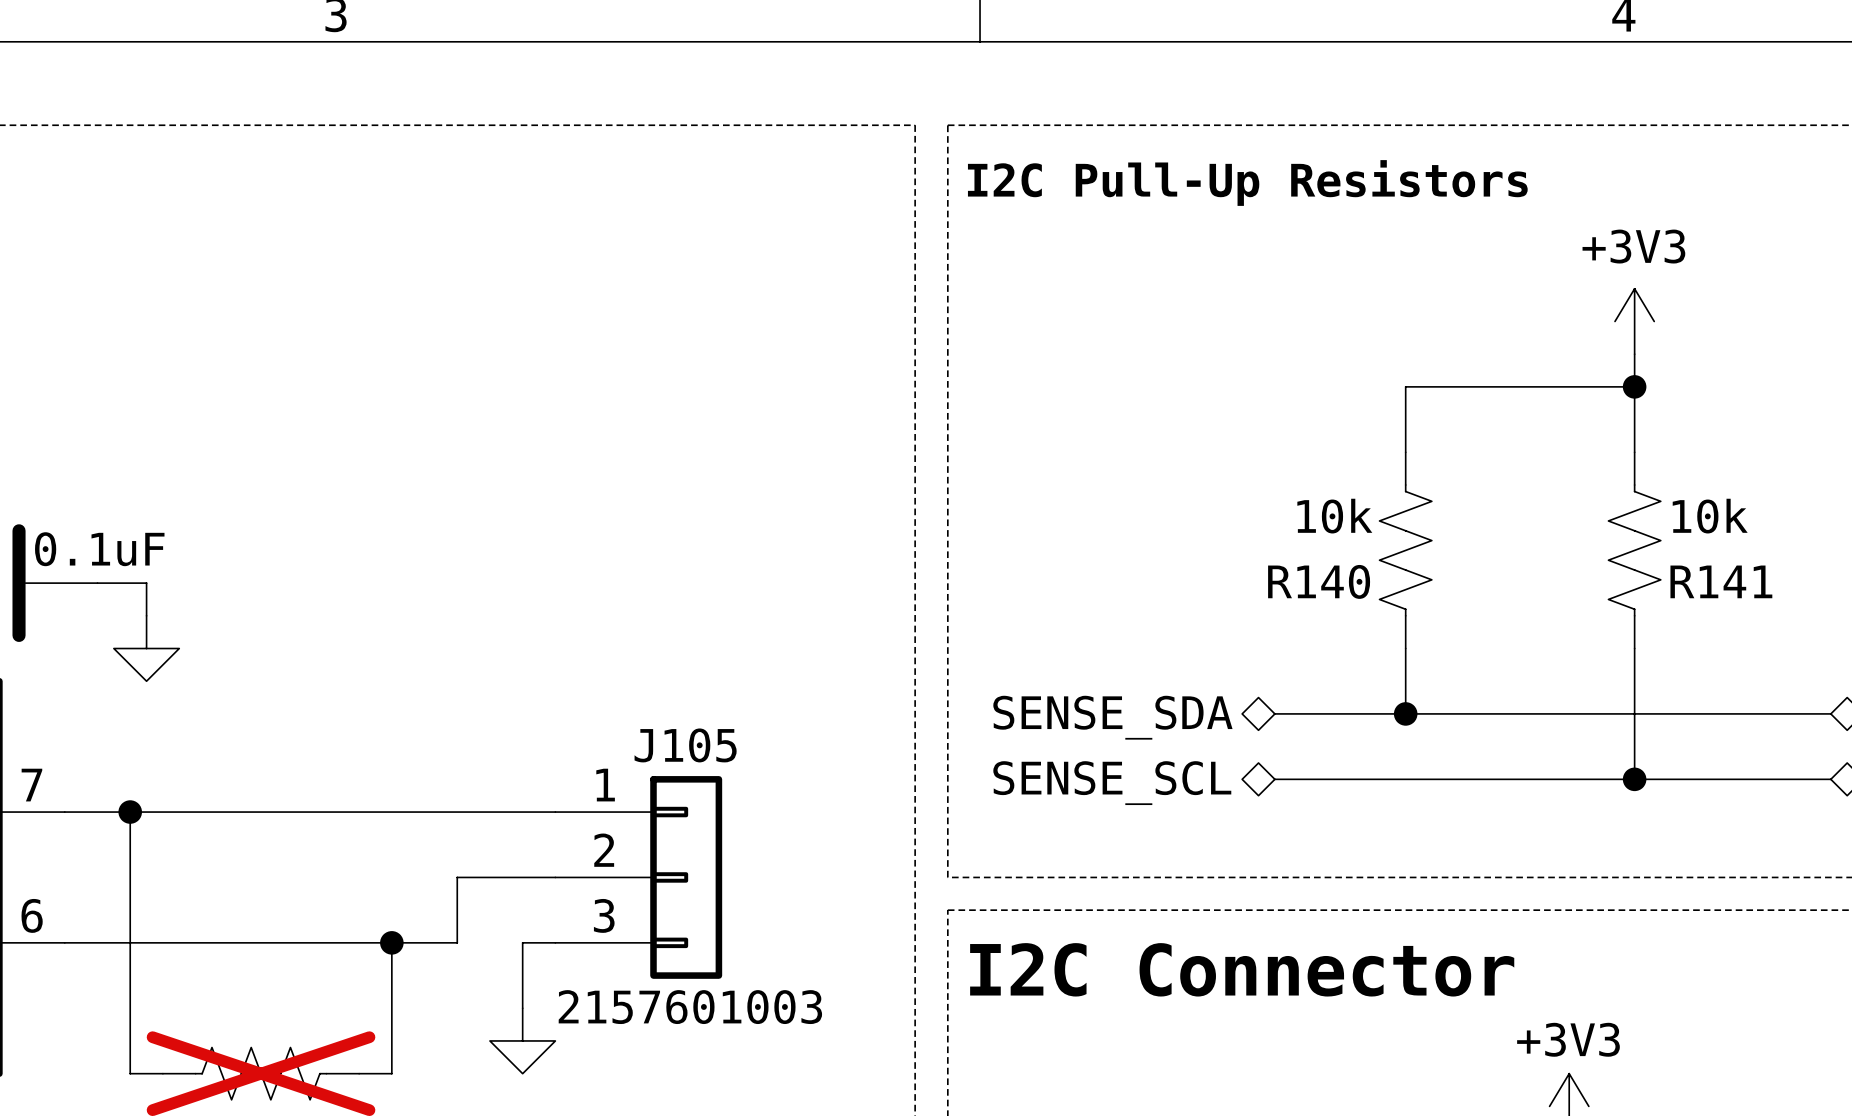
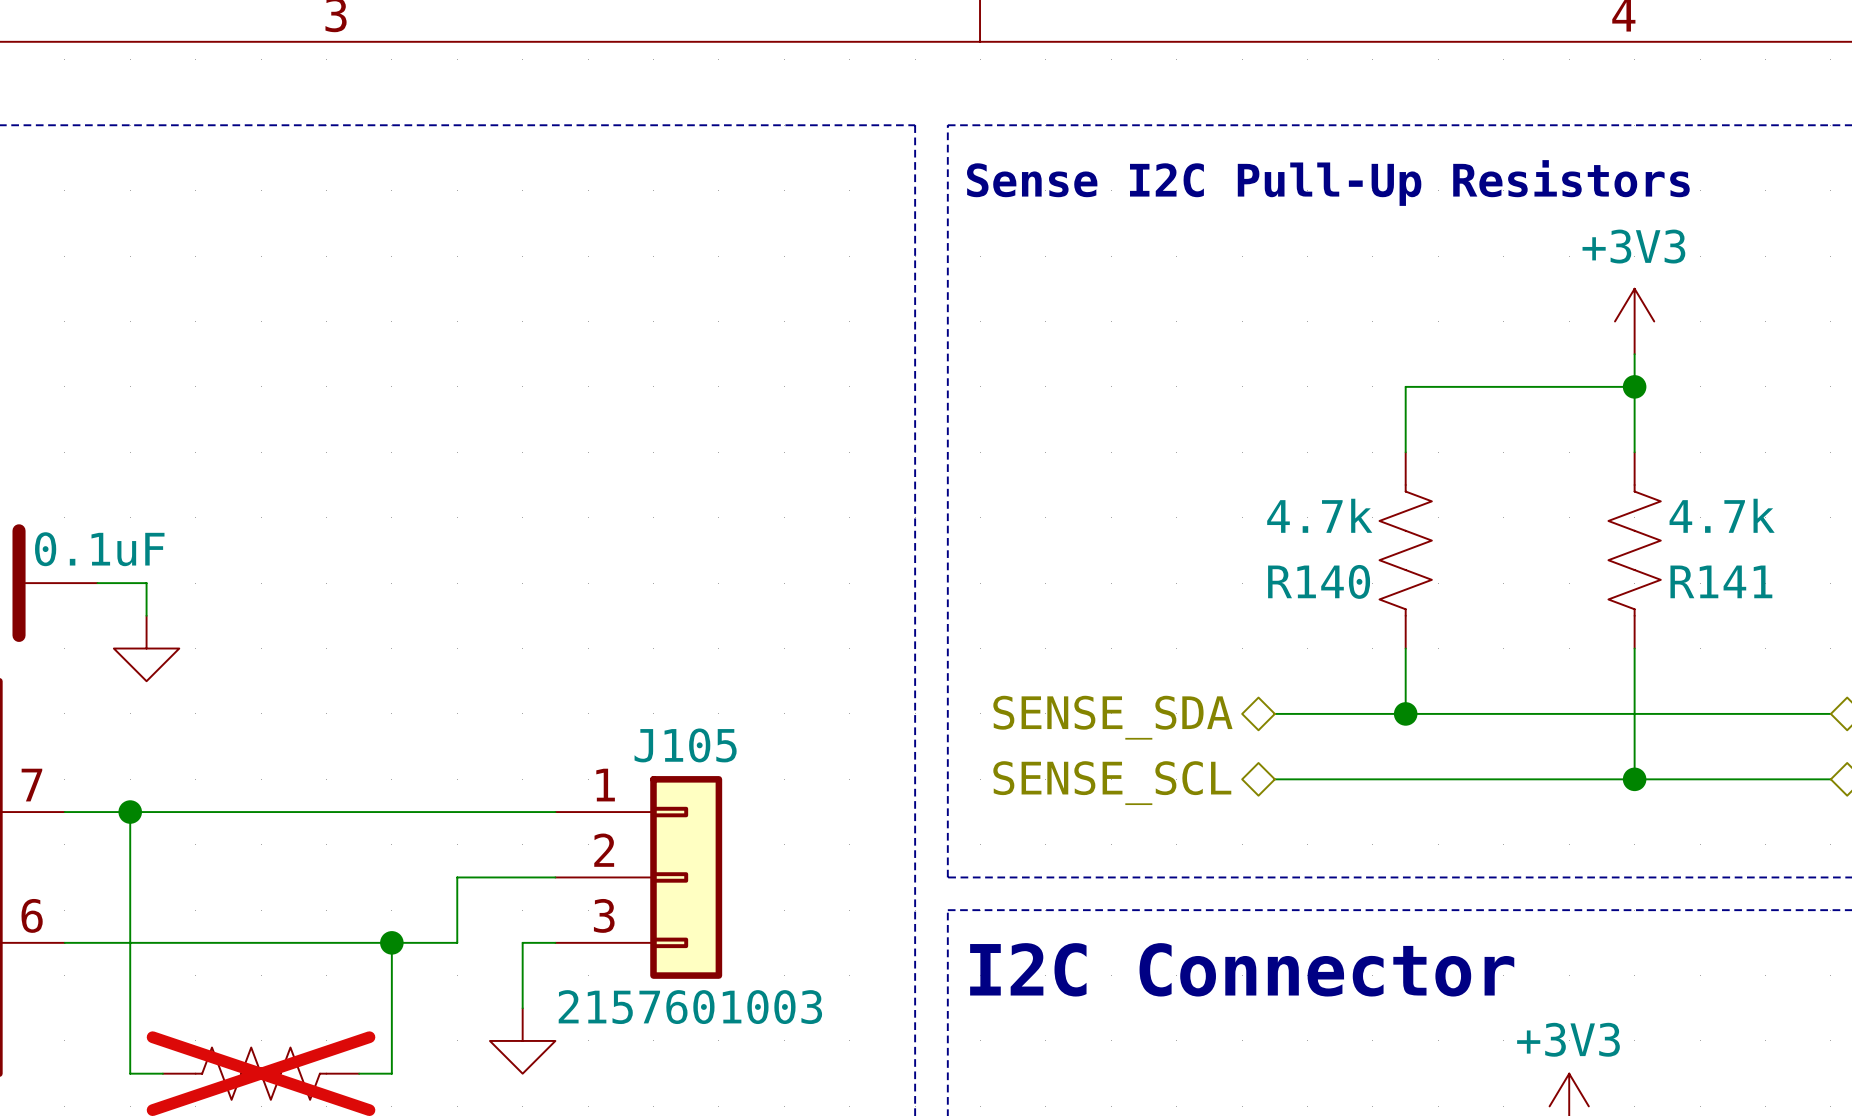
text: I2C Pull-Up Resistors (1247, 183) -> Sense I2C Pull-Up Resistors (1328, 183)
R140 value: 10k (1334, 516) -> 4.7k (1319, 515)
R141 value: 10k (1710, 516) -> 4.7k (1722, 515)

